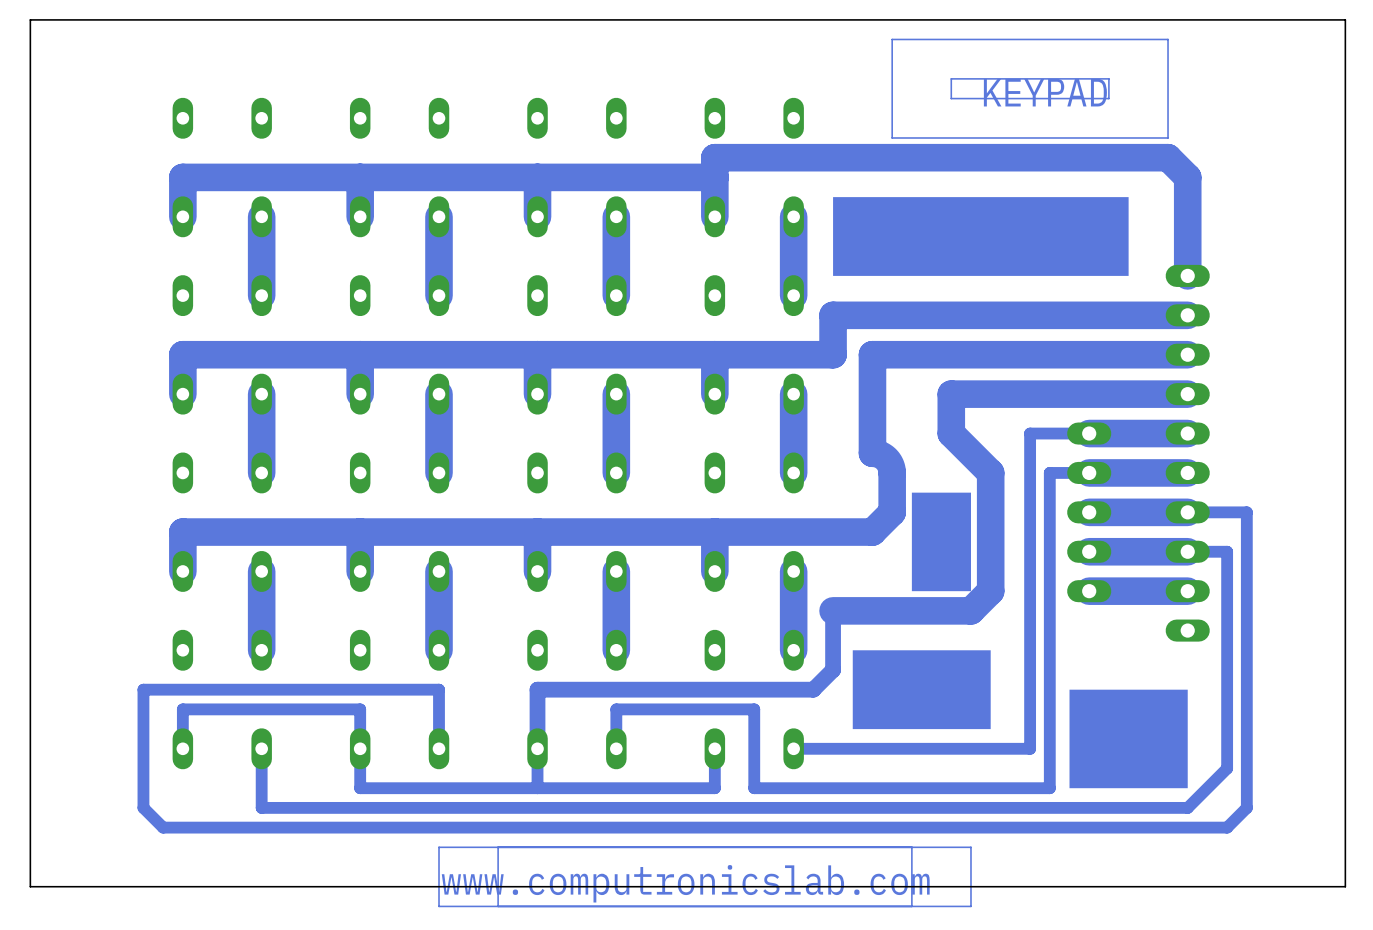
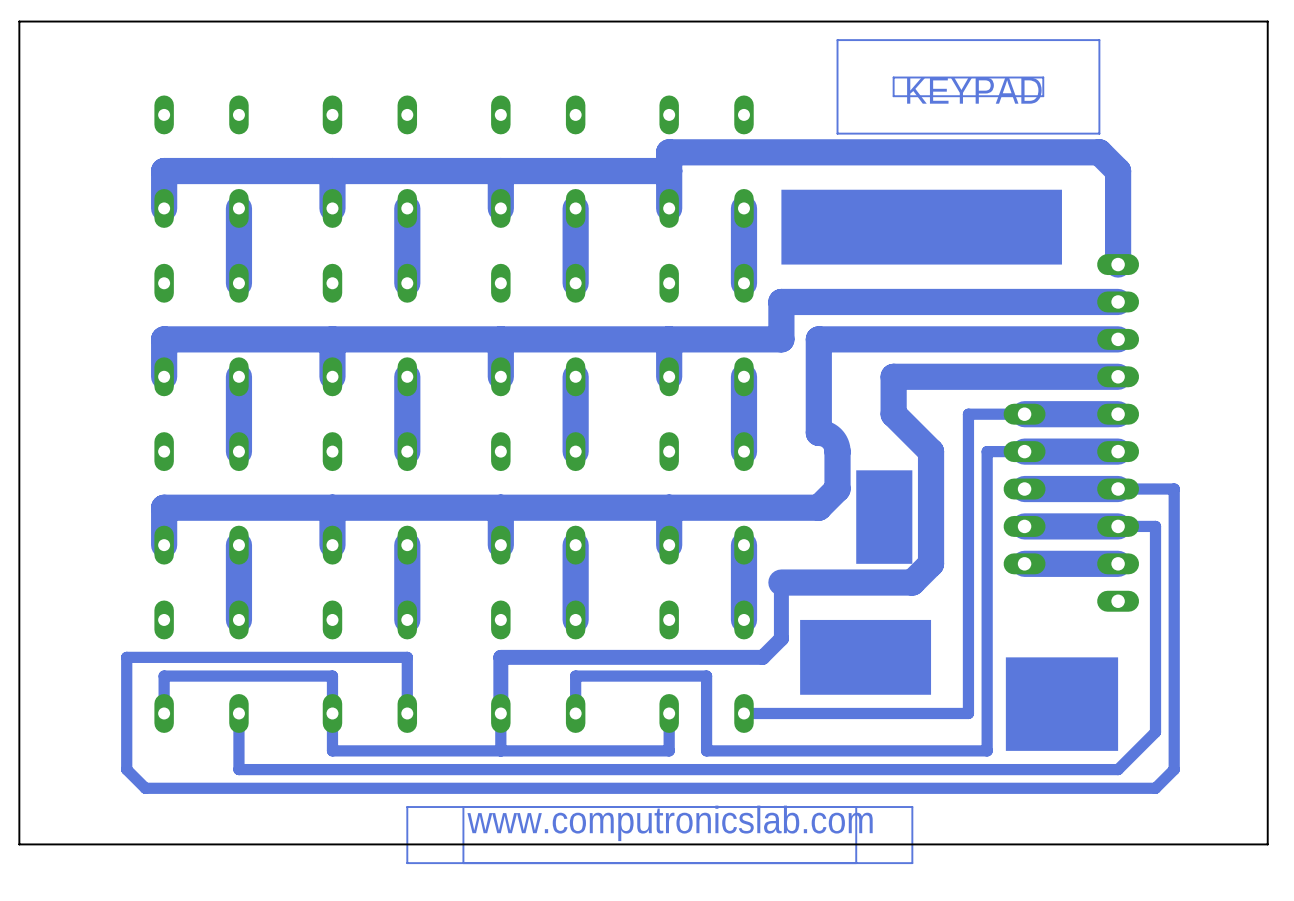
text position: www.computronicslab.com (685, 883) -> www.computronicslab.com (670, 823)

